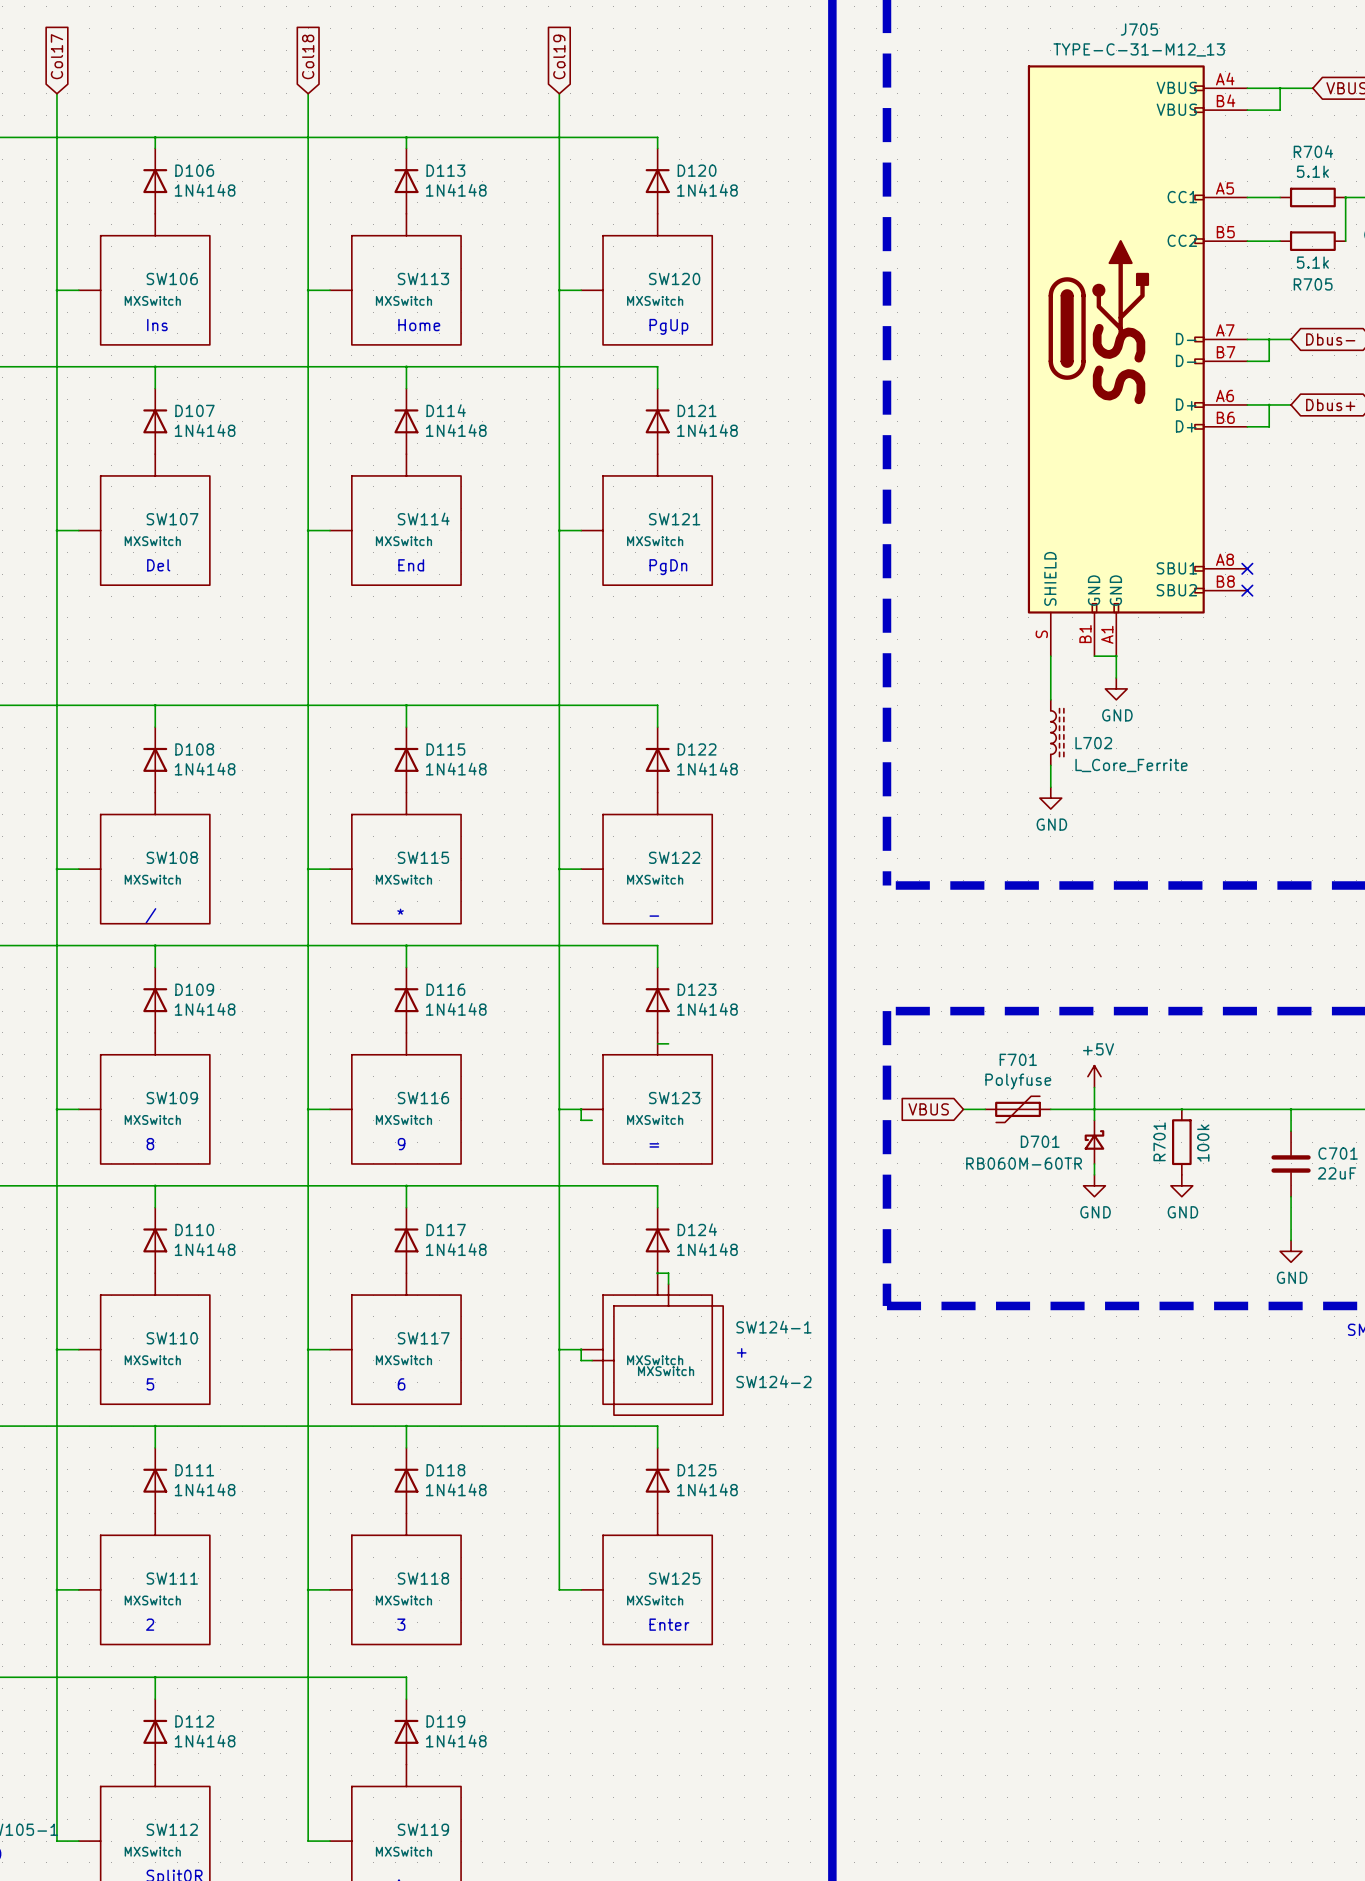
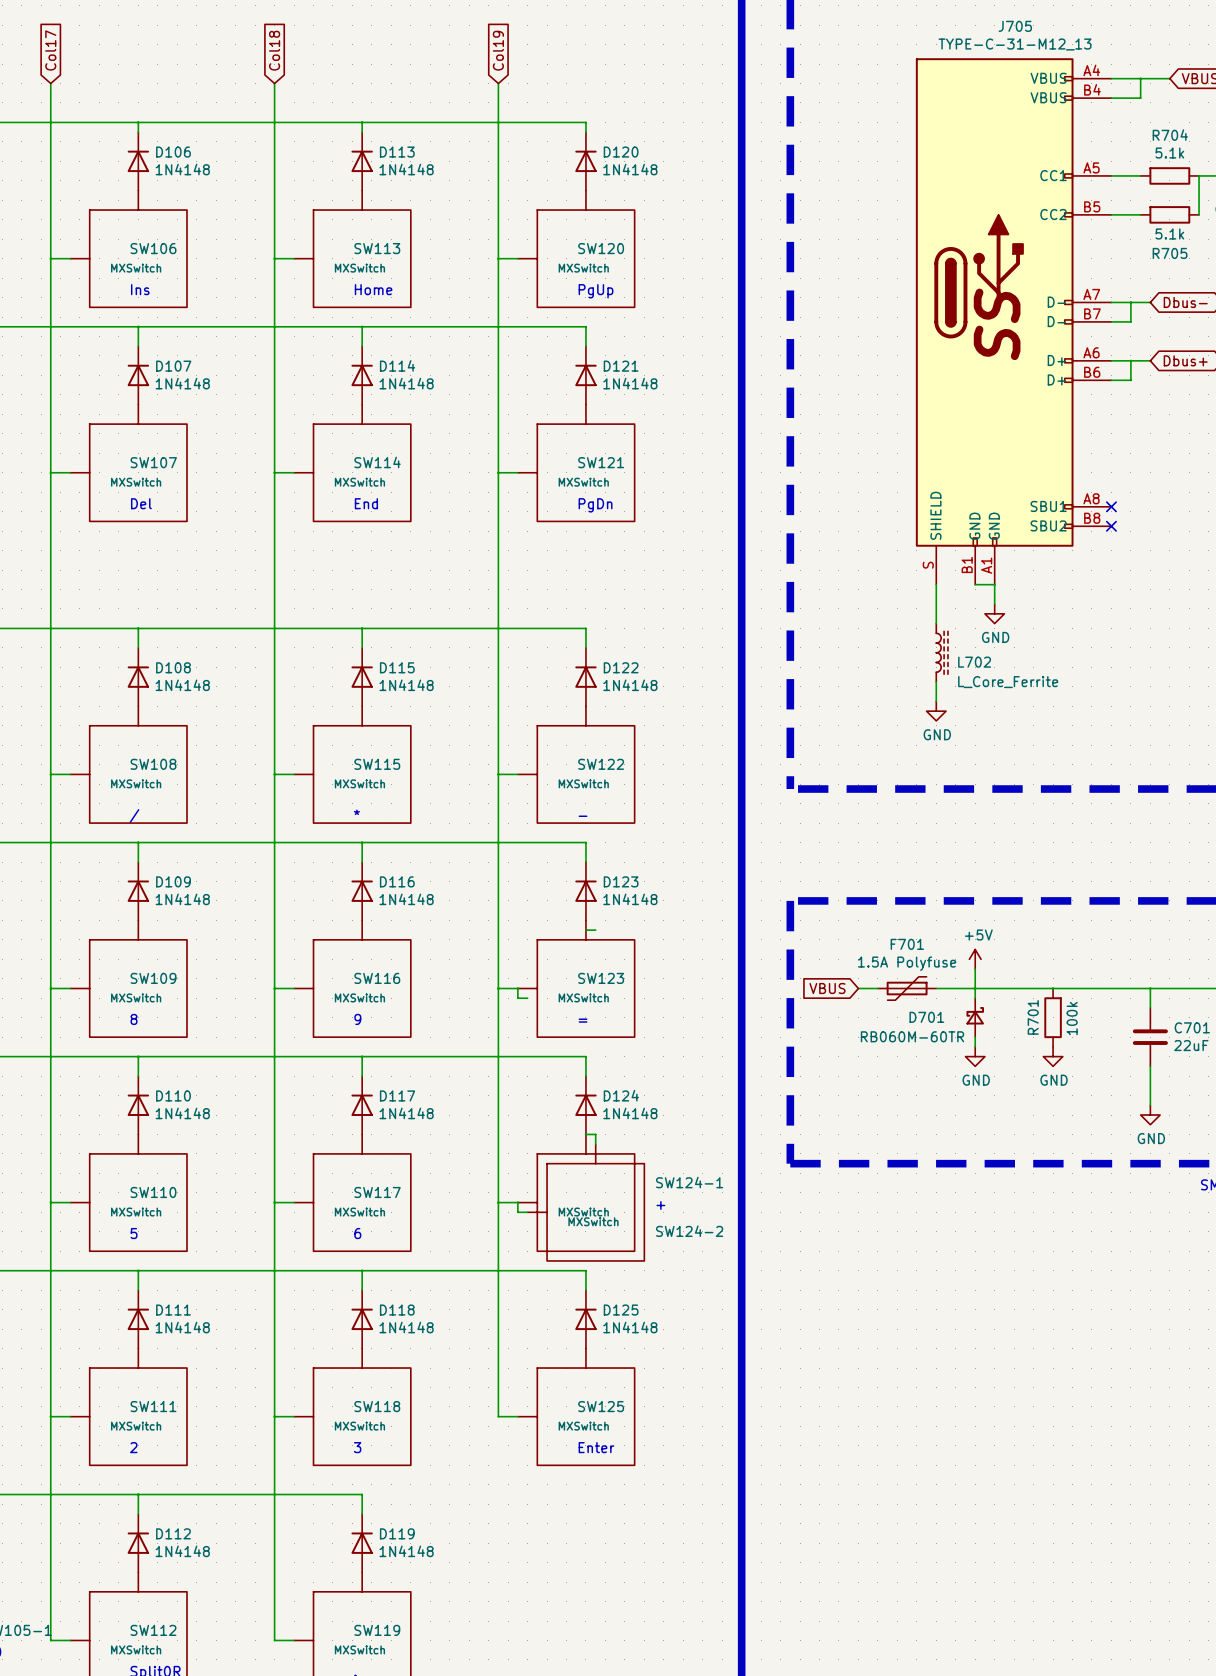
F701 value: Polyfuse (1018, 1081) -> 1.5A Polyfuse (907, 963)

